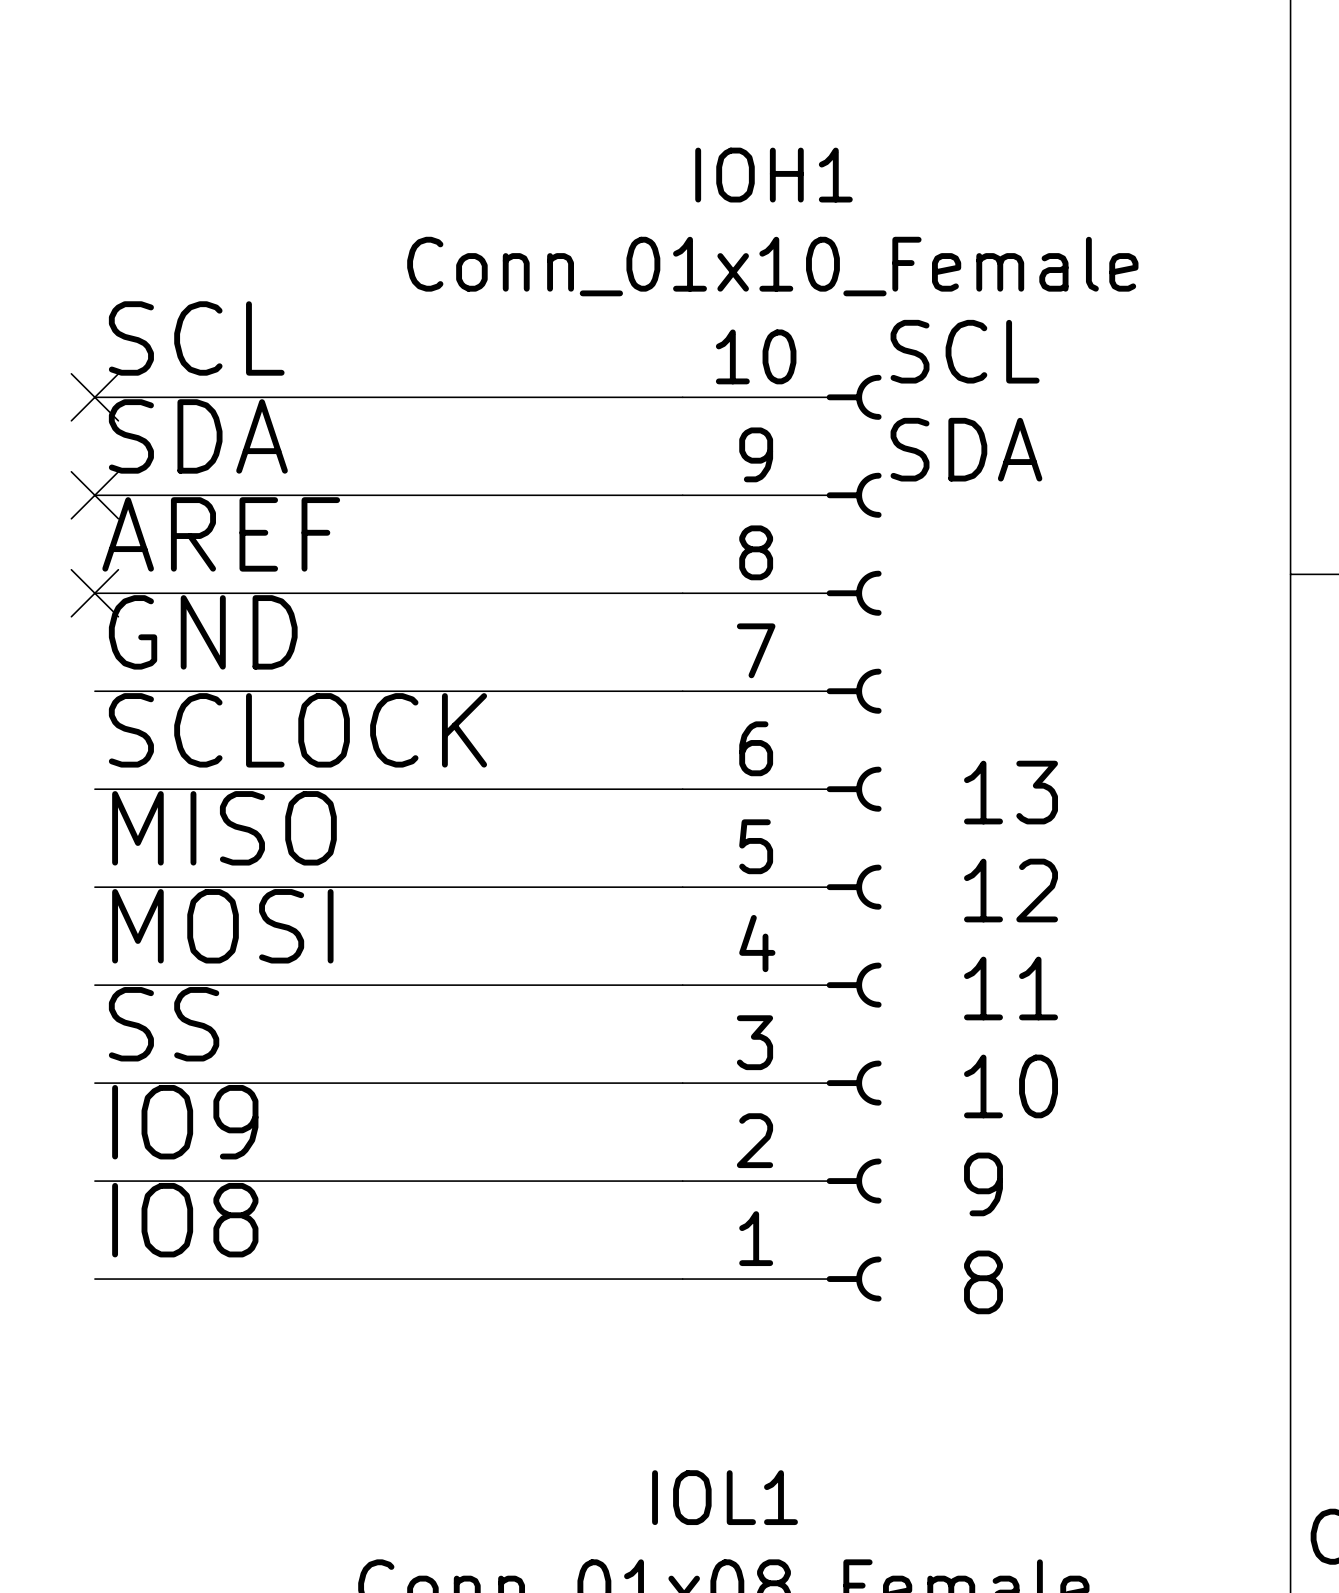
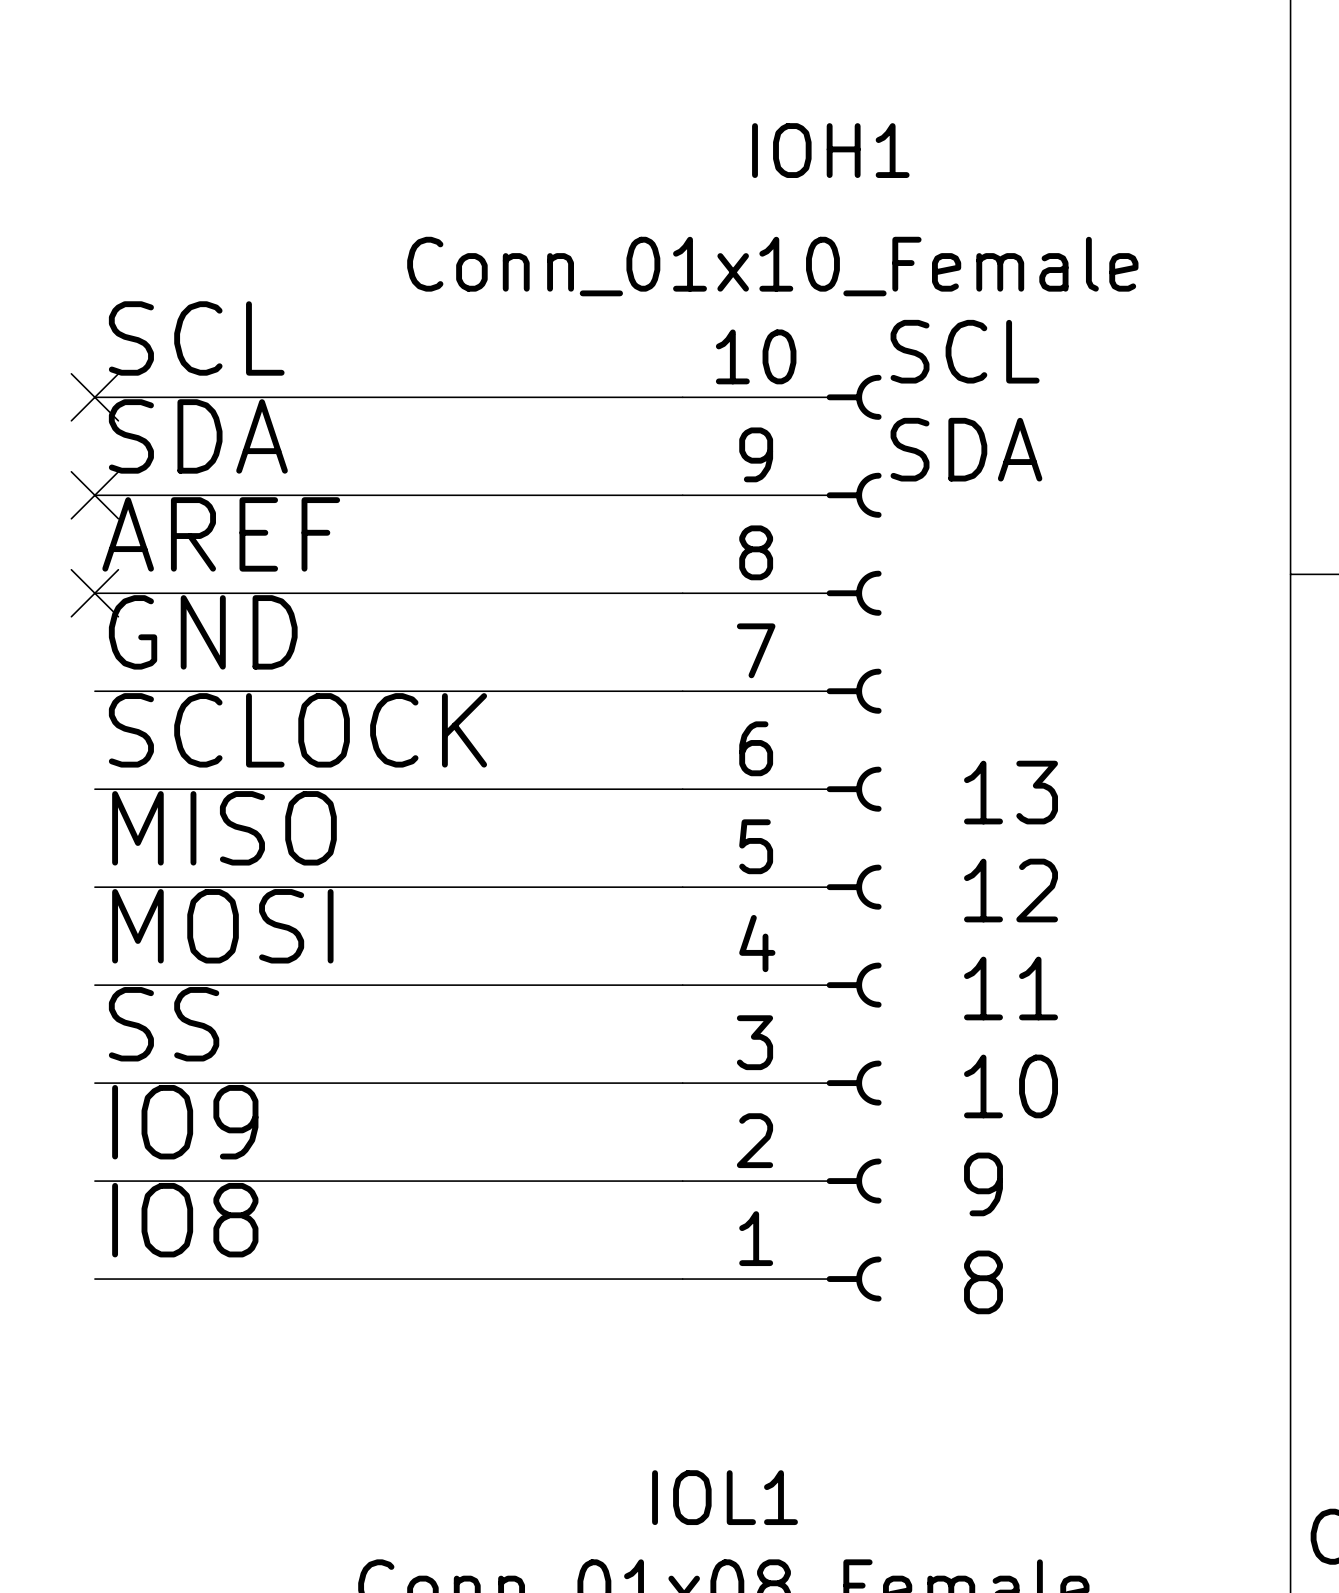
IOH1 name position: IOH1 (773, 175) -> IOH1 (830, 150)

